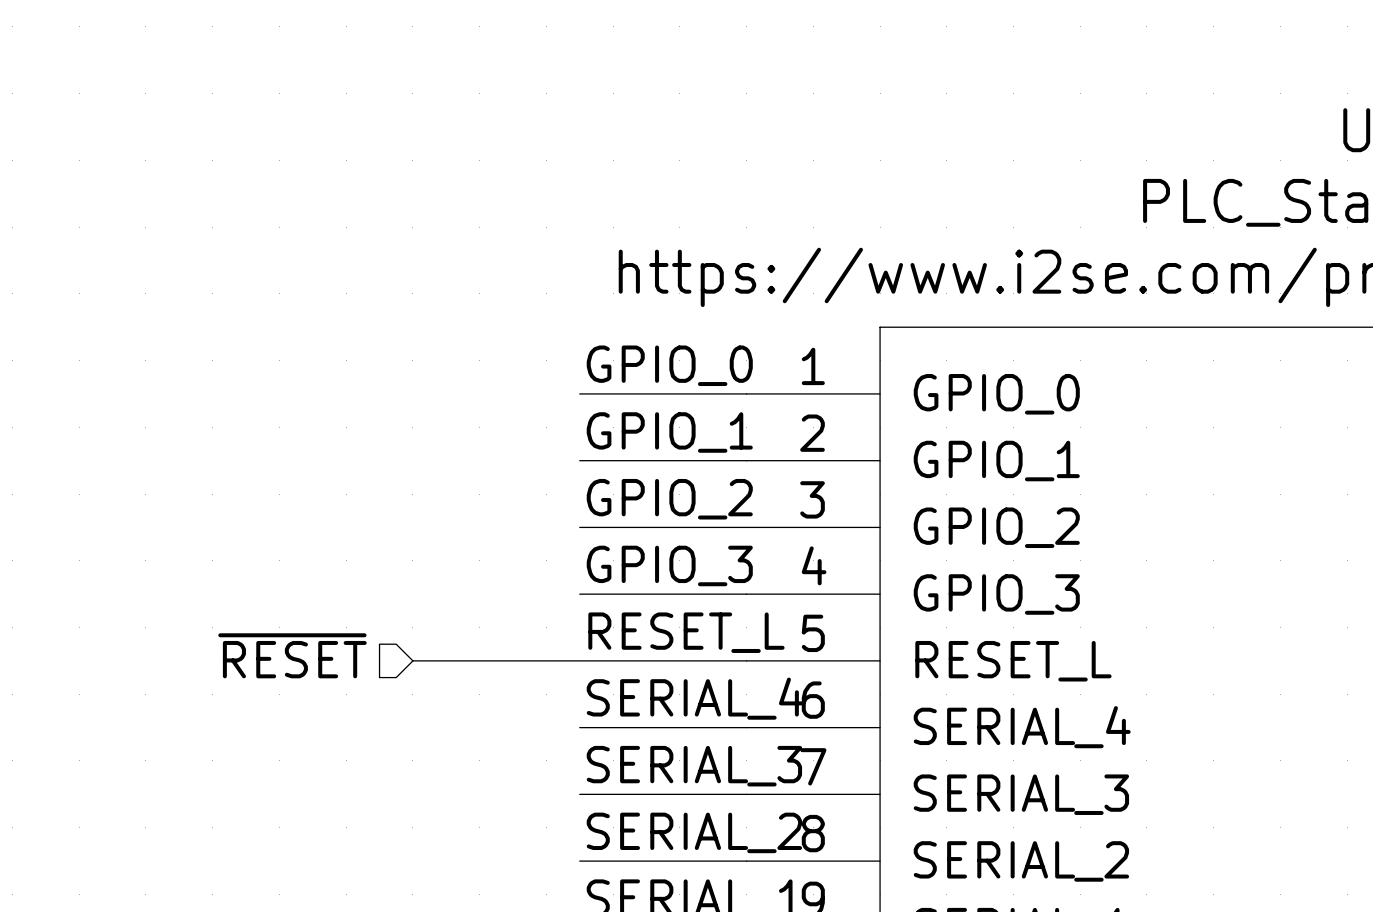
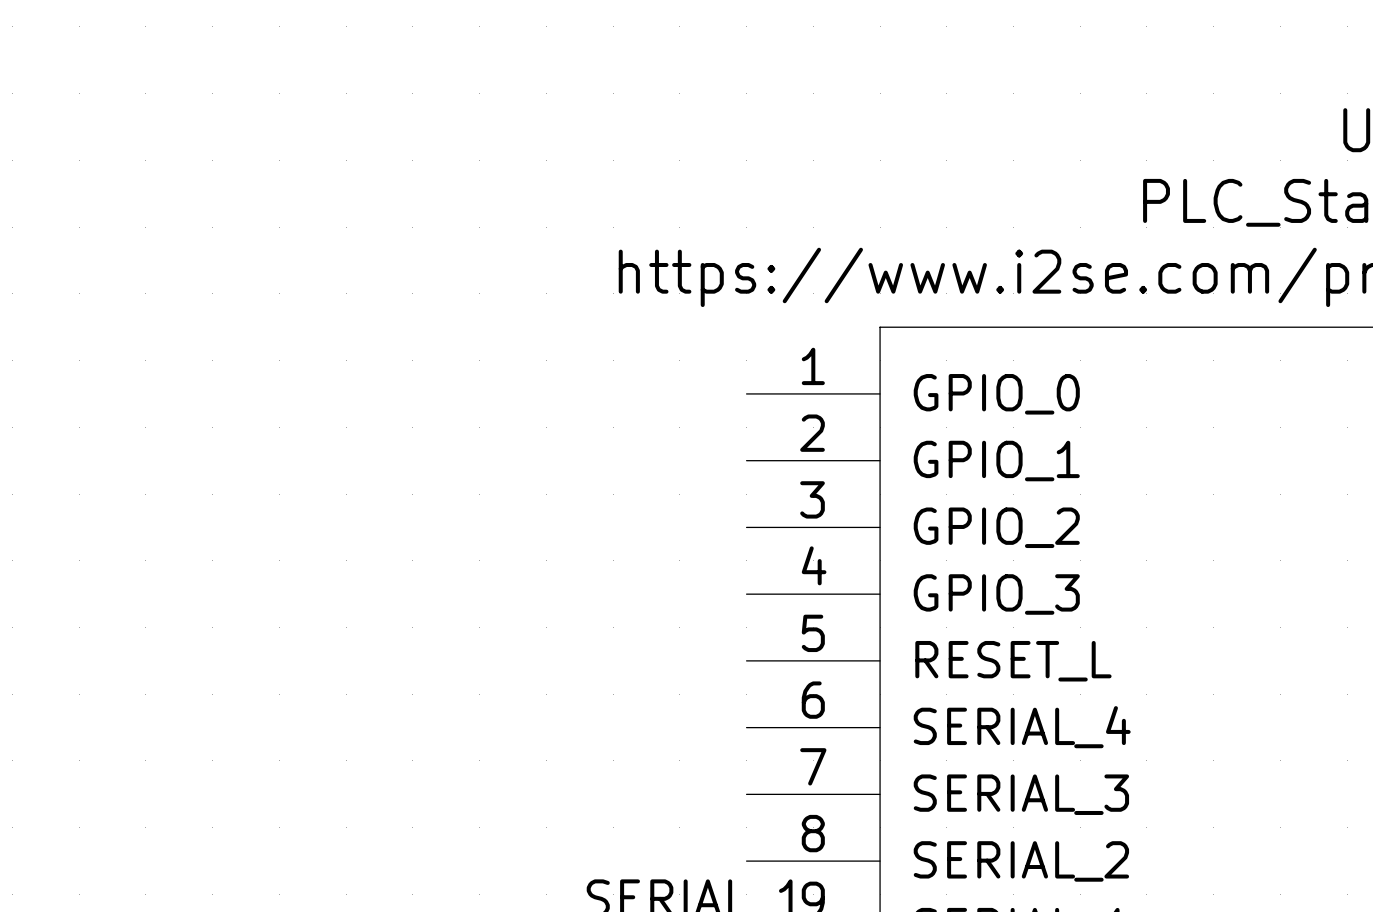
label: GPIO_0 (669, 365) -> none
wire: (579, 393) (746, 393) -> none
label: GPIO_1 (669, 432) -> none
wire: (579, 460) (746, 460) -> none
label: GPIO_2 (669, 499) -> none
wire: (579, 527) (746, 527) -> none
label: GPIO_3 (669, 565) -> none
wire: (579, 594) (746, 594) -> none
label: RESET_L (686, 632) -> none
hierarchical label: ~{RESET} (292, 655) -> none
wire: (412, 660) (746, 660) -> none
label: SERIAL_4 (695, 698) -> none
wire: (579, 727) (746, 727) -> none
label: SERIAL_3 (694, 766) -> none
wire: (579, 794) (746, 794) -> none
label: SERIAL_2 (694, 832) -> none
wire: (579, 861) (746, 861) -> none

